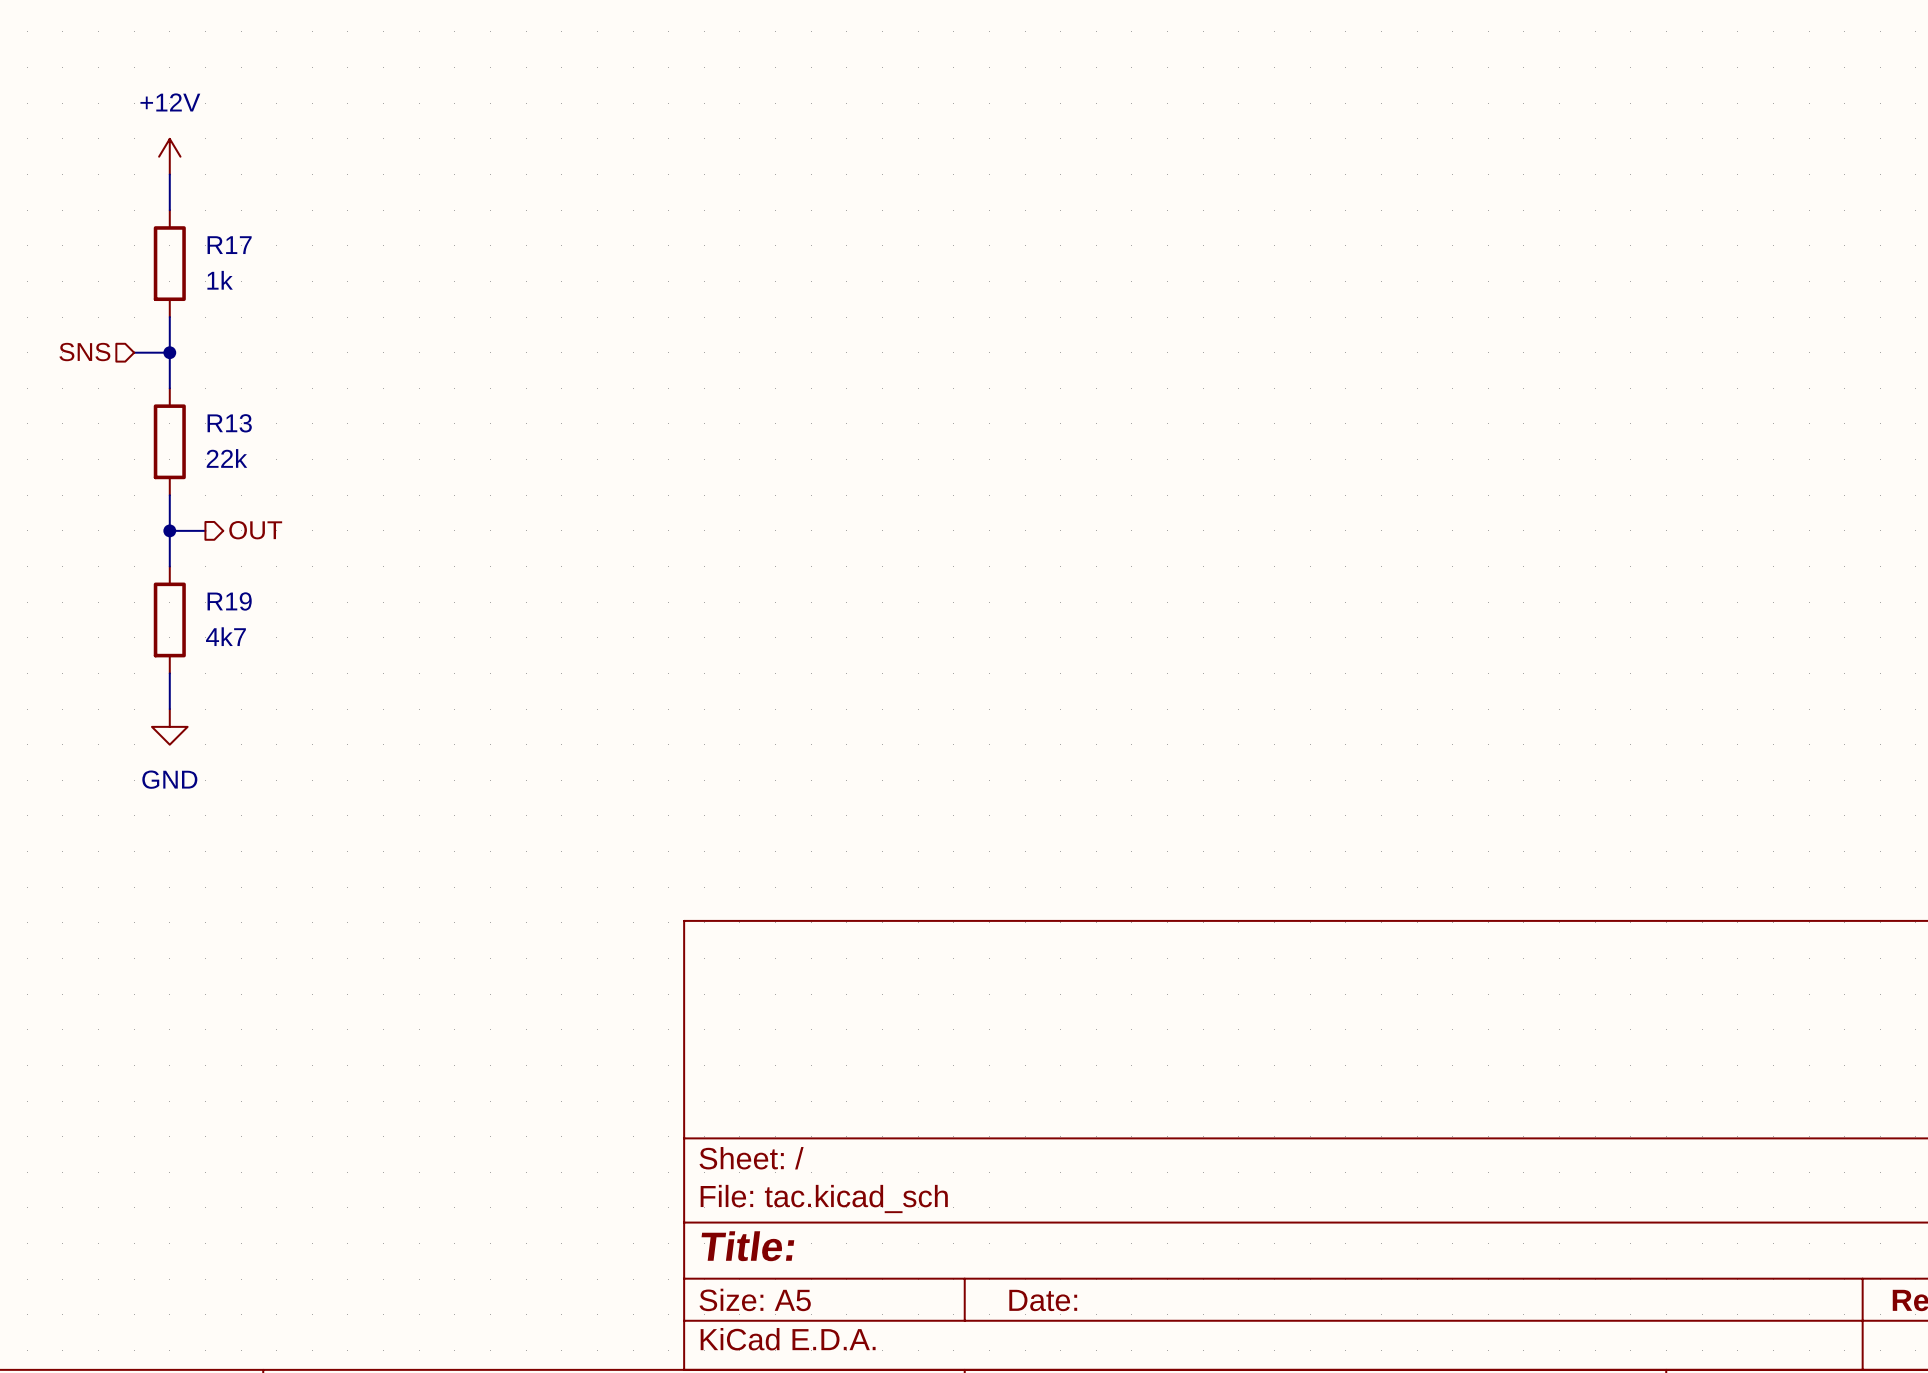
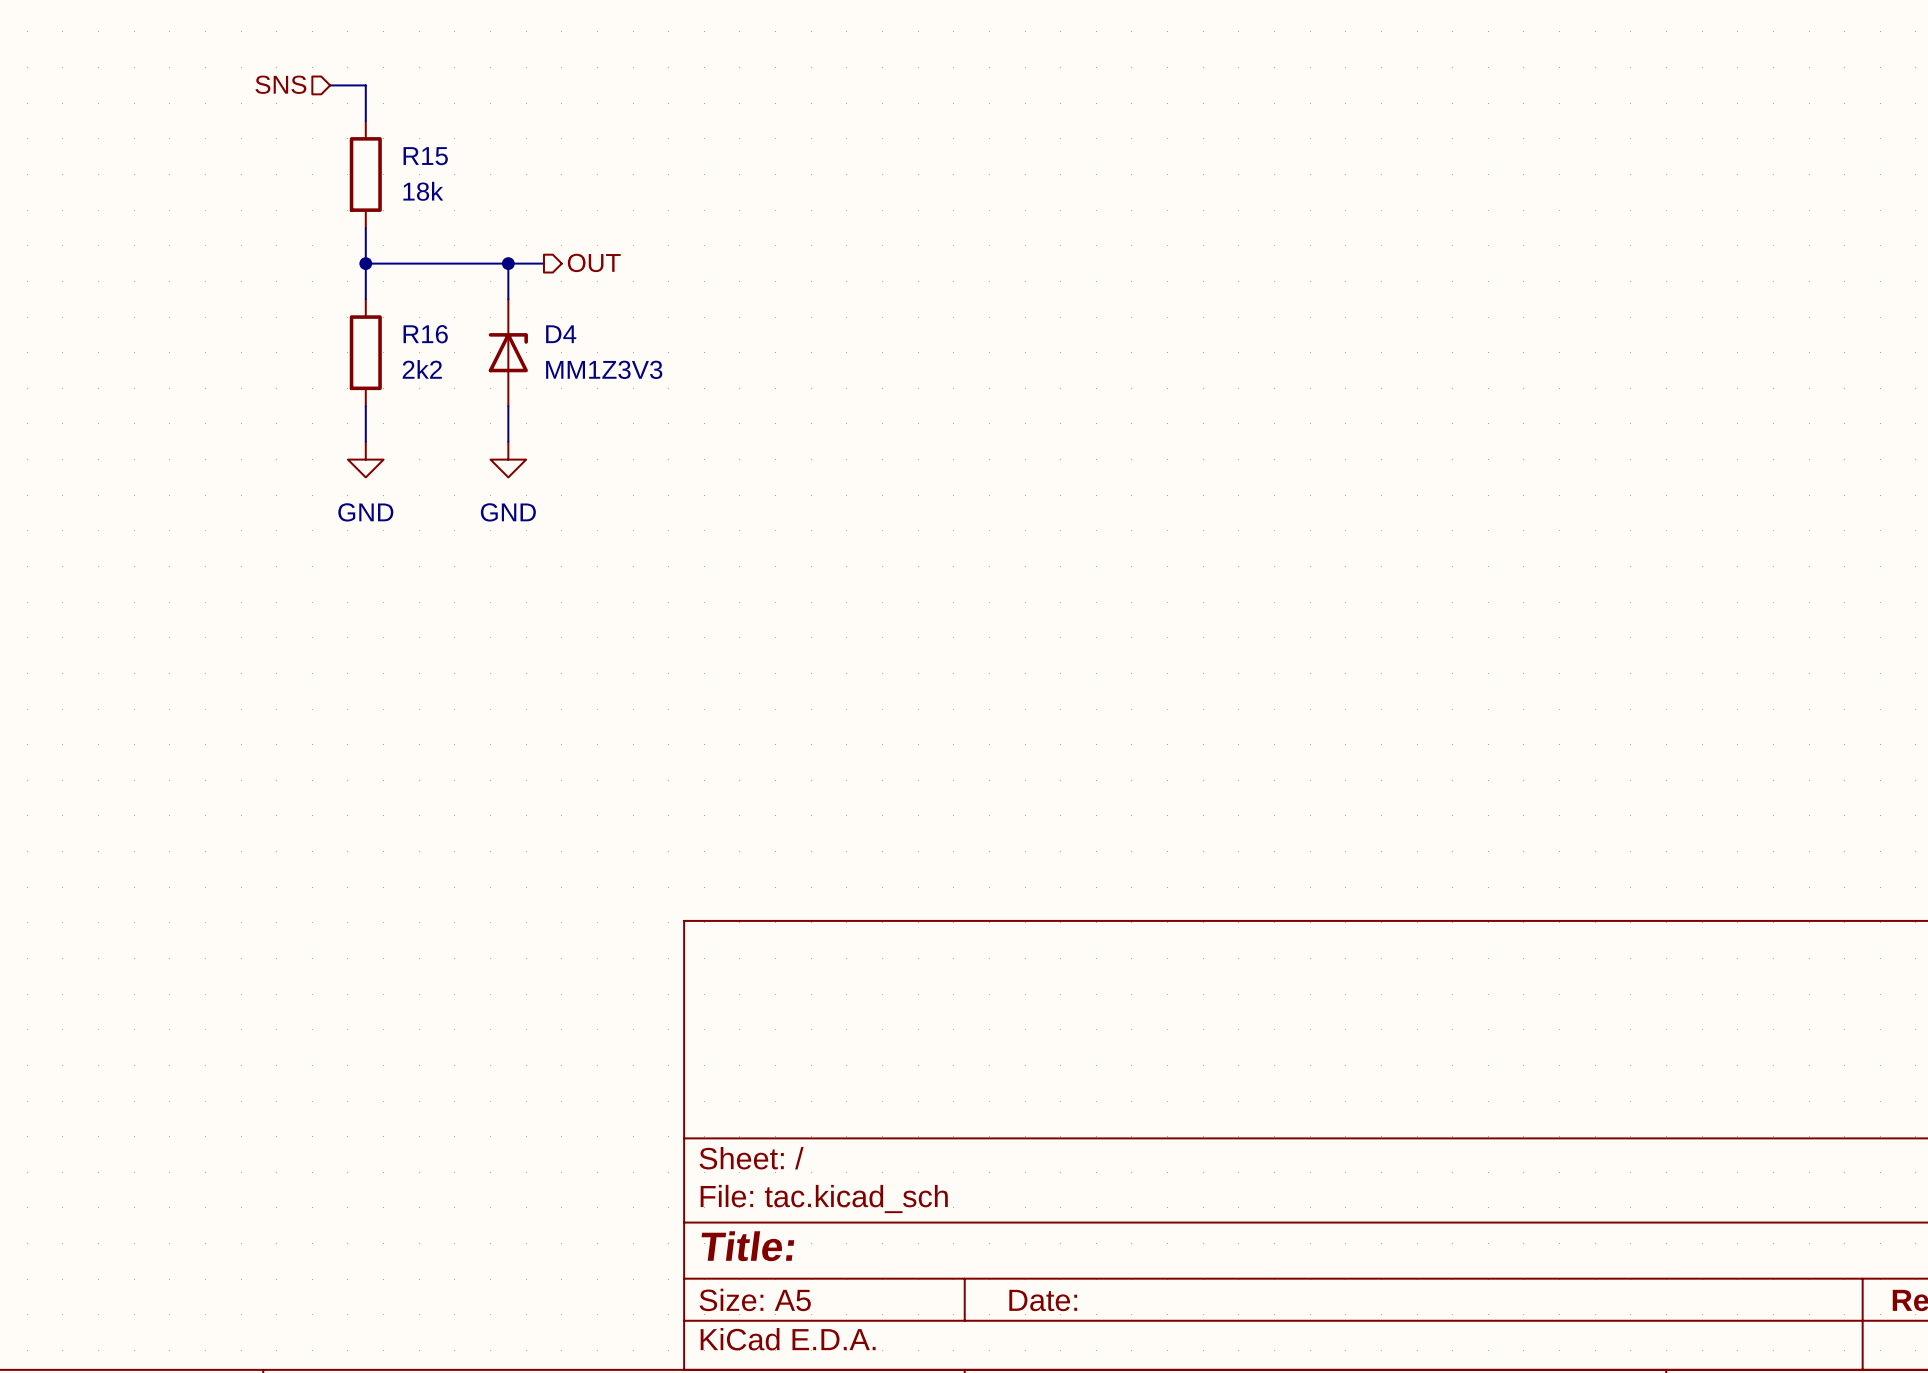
wire: none -> (330, 85) (365, 85) (365, 121)
power symbol: +12V (169, 156) -> none
wire: (169, 174) (169, 210) -> (508, 263) (508, 299)
R15: none -> 18k (365, 174)
hierarchical label: none -> OUT (594, 262)
R17: 1k (169, 263) -> none
wire: none -> (365, 263) (543, 263)
junction: none -> (365, 263)
junction: none -> (508, 263)
wire: (169, 317) (169, 388) -> none
hierarchical label position: SNS (84, 352) -> SNS (280, 84)
wire: (134, 352) (169, 352) -> none
junction: (169, 352) -> none
R16: none -> 2k2 (365, 352)
D4: none -> MM1Z3V3 (508, 352)
wire: none -> (508, 406) (508, 441)
R13: 22k (169, 441) -> none
power symbol: none -> GND (365, 459)
power symbol: none -> GND (508, 459)
wire: (169, 495) (169, 566) -> (365, 227) (365, 299)
wire: (169, 530) (205, 530) -> none
junction: (169, 530) -> none
hierarchical label: OUT (255, 530) -> none
R19: 4k7 (169, 619) -> none
wire: (169, 673) (169, 709) -> (365, 406) (365, 441)
power symbol: GND (169, 726) -> none

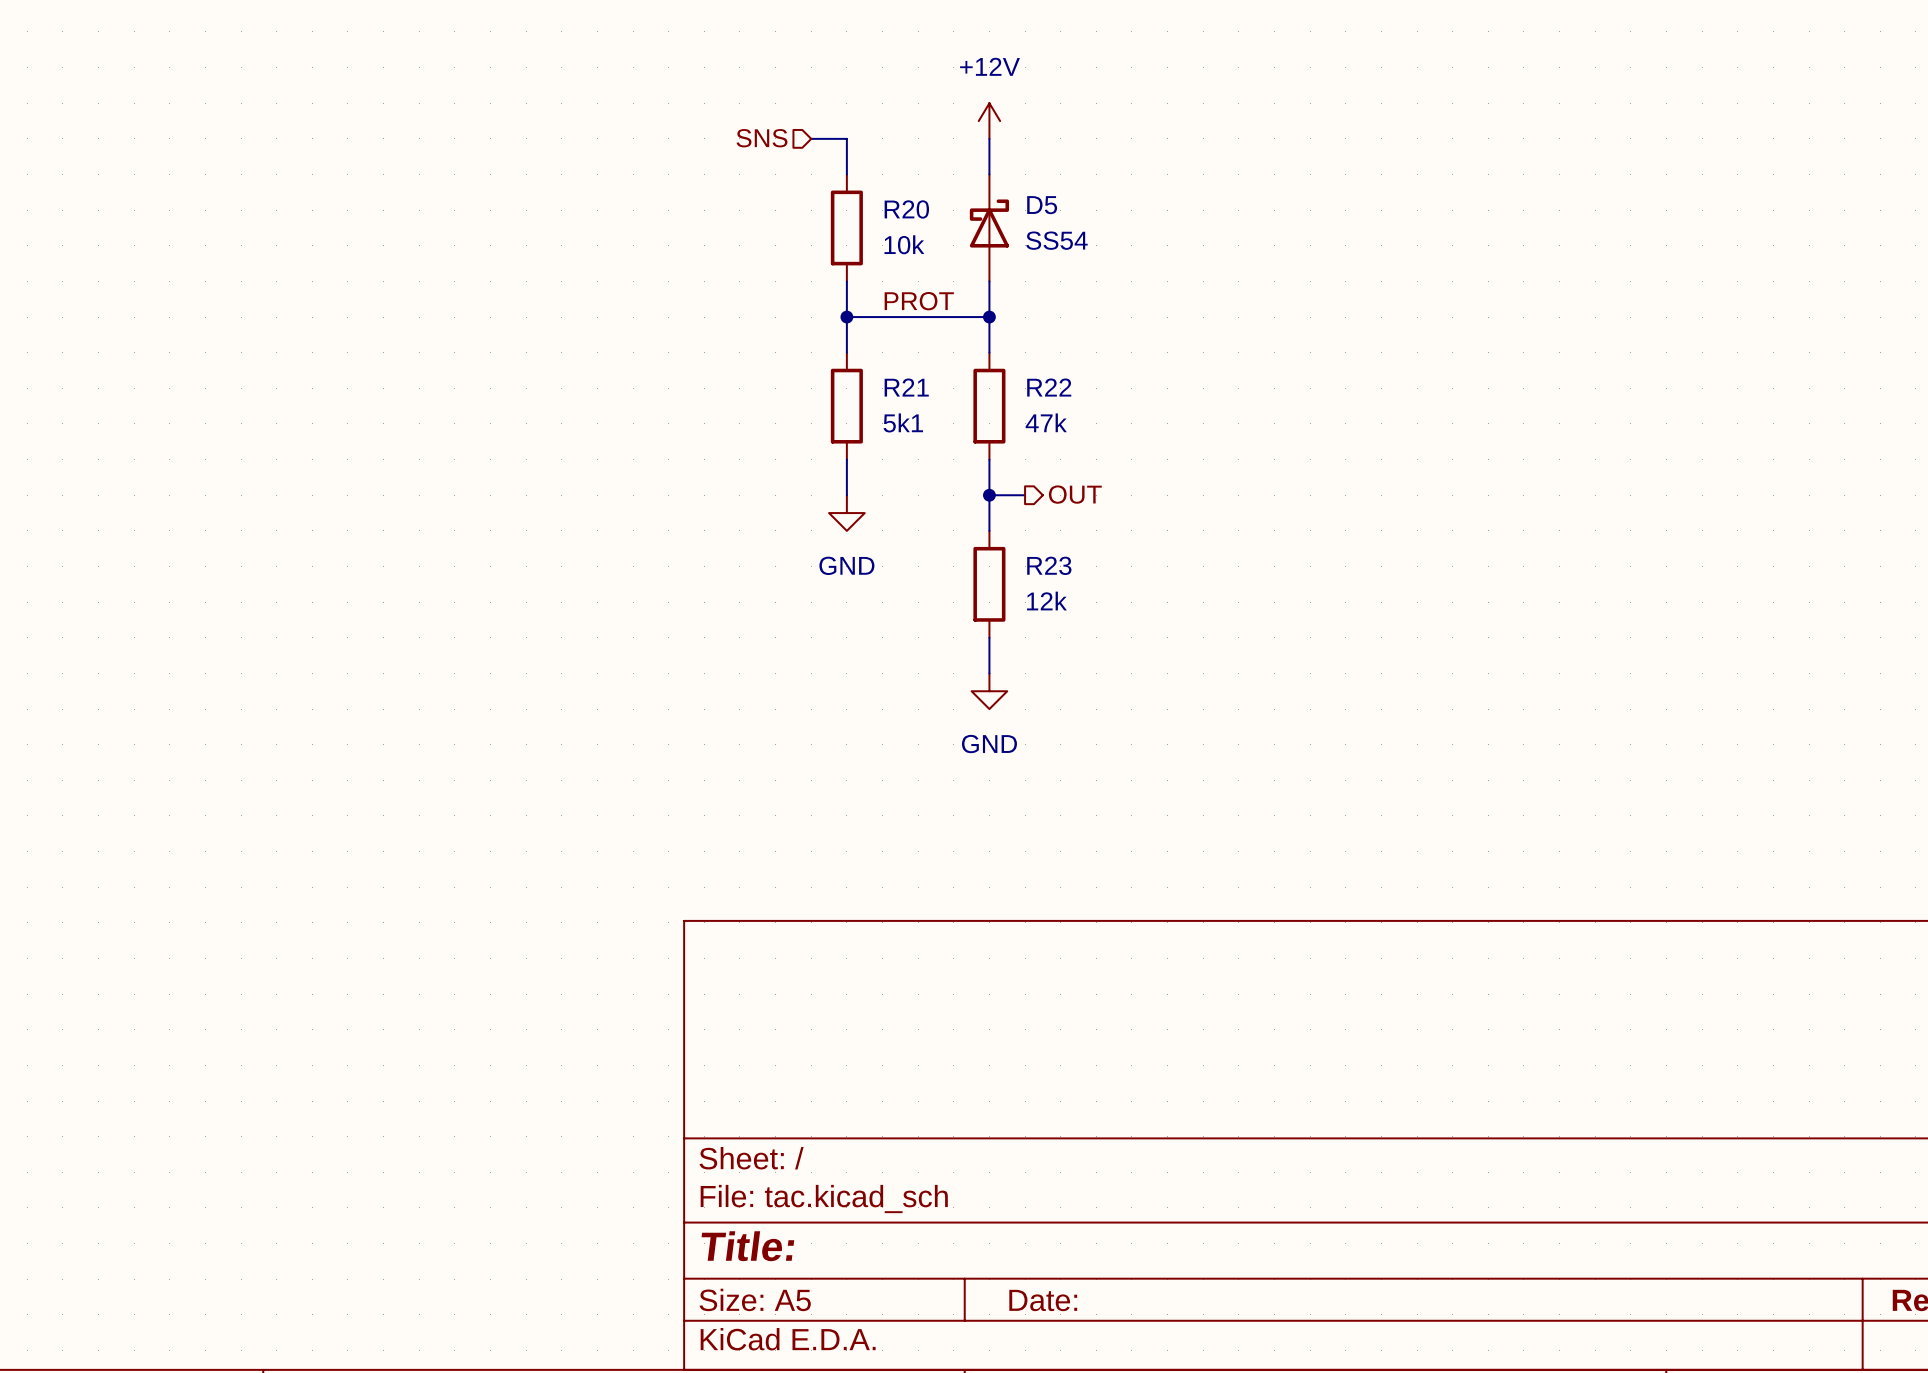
hierarchical label: SNS (280, 84) -> none
wire: (330, 85) (365, 85) (365, 121) -> none
power symbol: none -> +12V (989, 121)
hierarchical label: none -> SNS (761, 138)
wire: none -> (811, 138) (846, 138) (846, 174)
wire: none -> (989, 138) (989, 174)
R15: 18k (365, 174) -> none
wire: (365, 227) (365, 299) -> none
R20: none -> 10k (846, 227)
D5: none -> SS54 (989, 227)
hierarchical label: OUT (594, 262) -> none
wire: (365, 263) (543, 263) -> none
junction: (365, 263) -> none
wire: (508, 263) (508, 299) -> none
junction: (508, 263) -> none
wire: none -> (846, 281) (846, 352)
wire: none -> (989, 281) (989, 352)
label: none -> PROT (919, 301)
wire: none -> (846, 317) (989, 317)
junction: none -> (846, 317)
junction: none -> (989, 317)
R16: 2k2 (365, 352) -> none
D4: MM1Z3V3 (508, 352) -> none
wire: (365, 406) (365, 441) -> none
wire: (508, 406) (508, 441) -> (846, 459) (846, 495)
R21: none -> 5k1 (846, 406)
R22: none -> 47k (989, 406)
power symbol: GND (365, 459) -> none
power symbol: GND (508, 459) -> none
wire: none -> (989, 459) (989, 530)
hierarchical label: none -> OUT (1075, 494)
wire: none -> (989, 495) (1025, 495)
junction: none -> (989, 495)
power symbol: none -> GND (846, 513)
R23: none -> 12k (989, 584)
wire: none -> (989, 637) (989, 673)
power symbol: none -> GND (989, 691)

